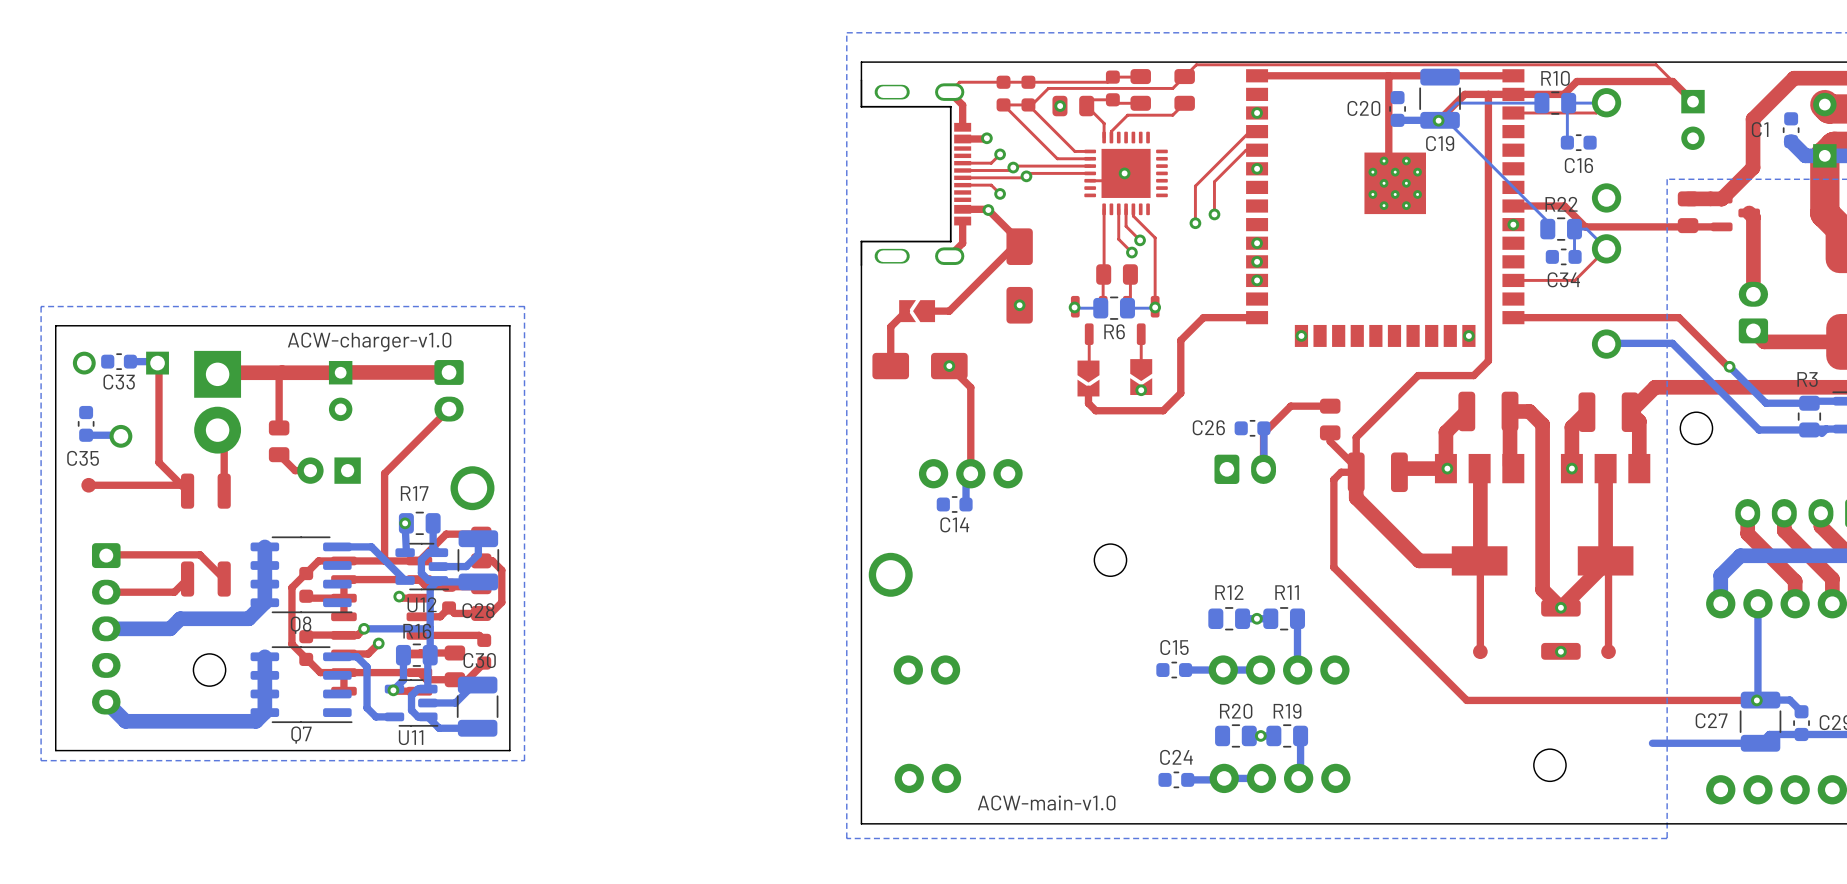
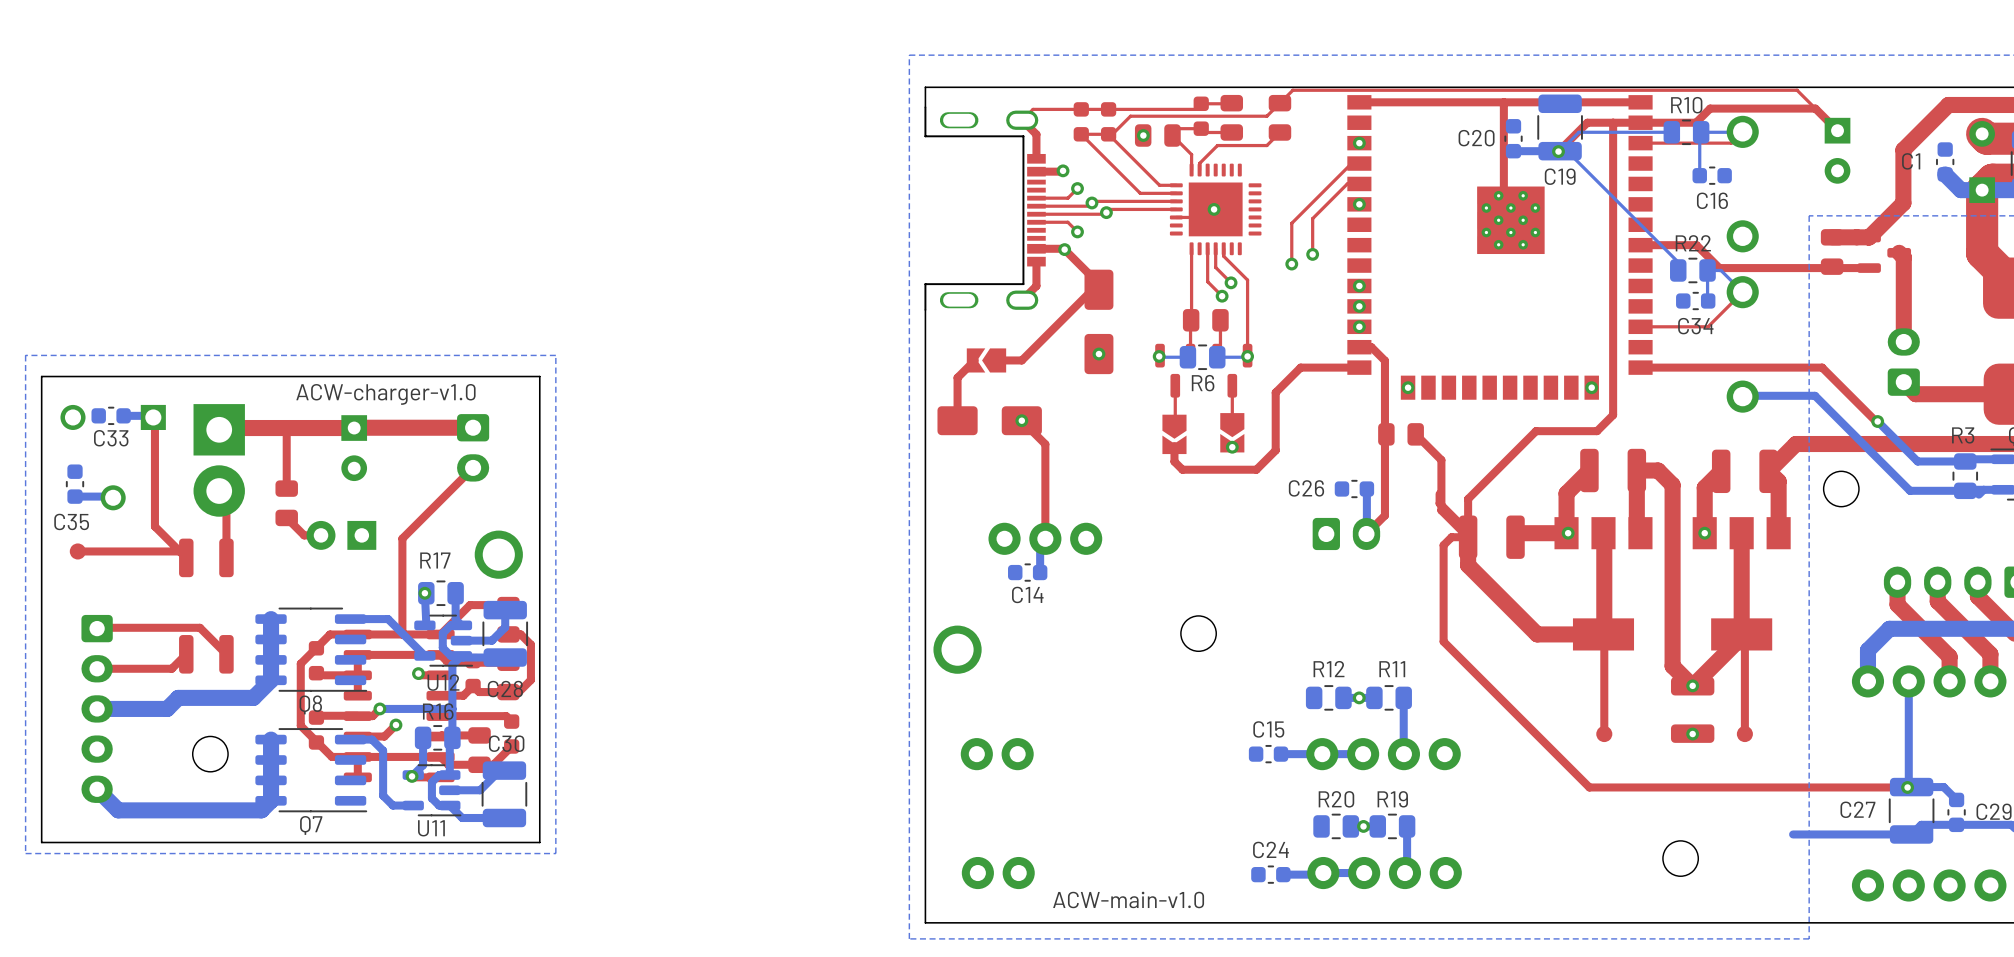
via: (1513, 224) -> none
top track: none -> (1415, 434) (1441, 460) (1441, 510) (1468, 537)
top track: (1330, 406) (1290, 406) (1263, 433) (1263, 469) -> (1359, 347) (1371, 347) (1384, 360) (1384, 515) (1366, 533)
part rotation: 0° (1330, 419) -> 90° clockwise (1401, 434)
part position: (1330, 419) -> (1401, 434)

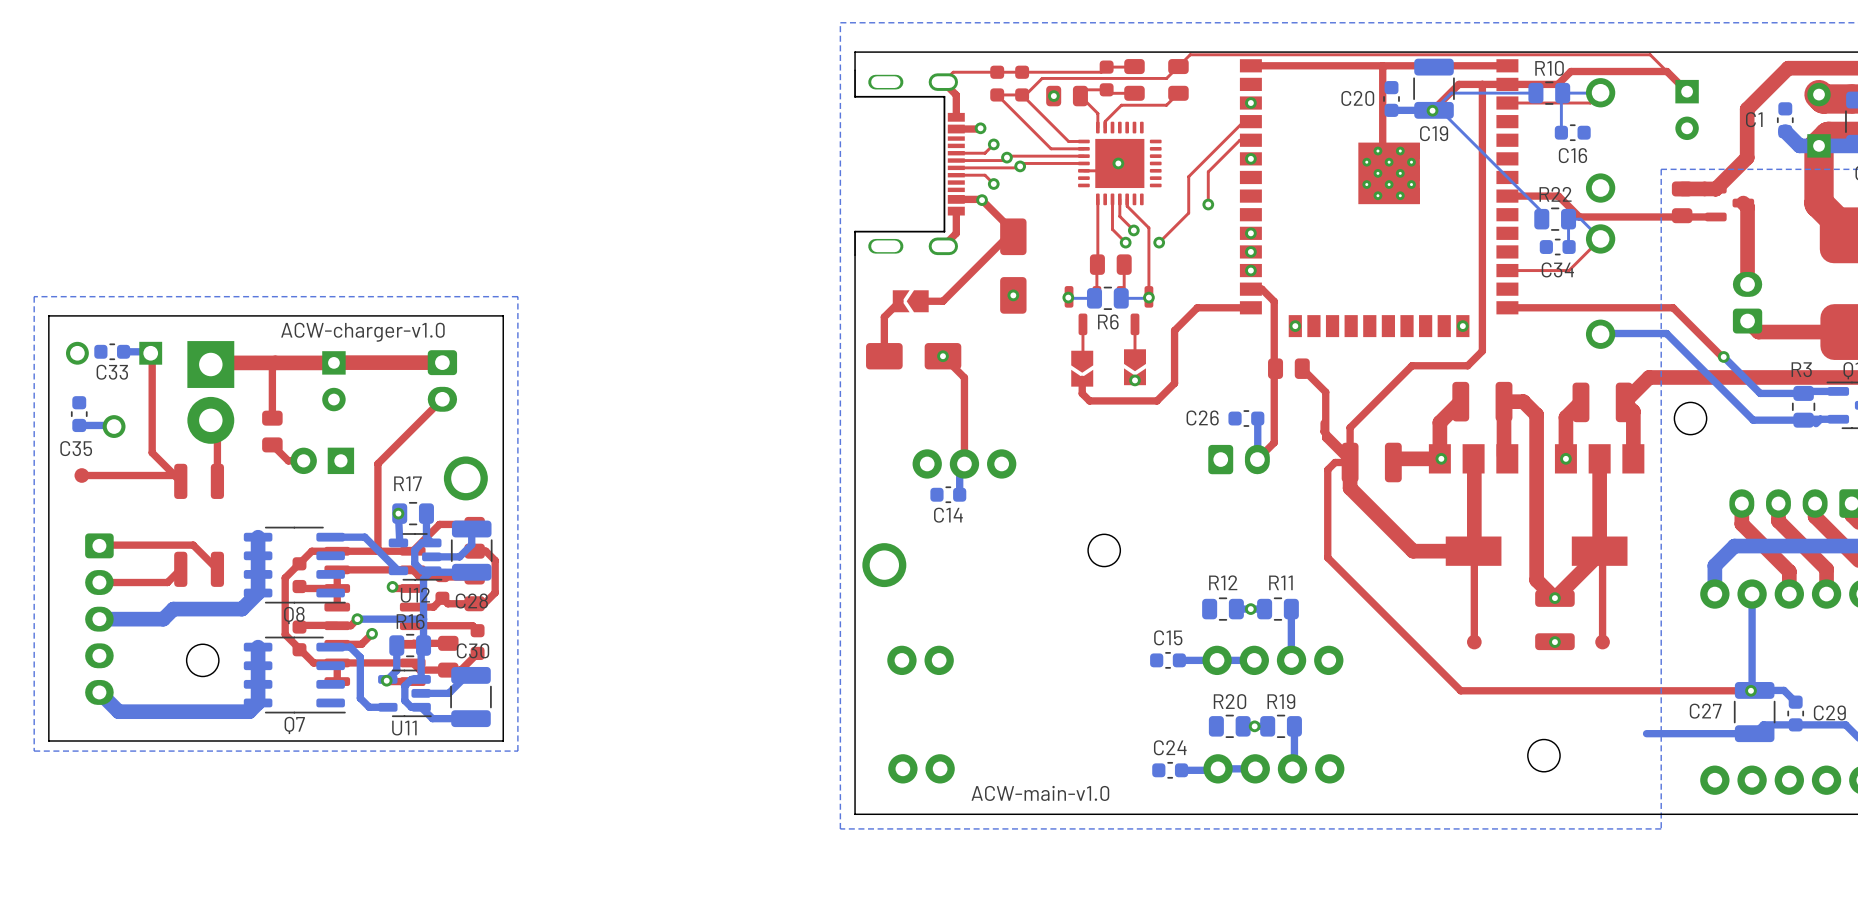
top track: (1291, 223) (1291, 263) -> (1189, 176) (1188, 213) (1159, 242)
via position: (1291, 264) -> (1159, 242)

